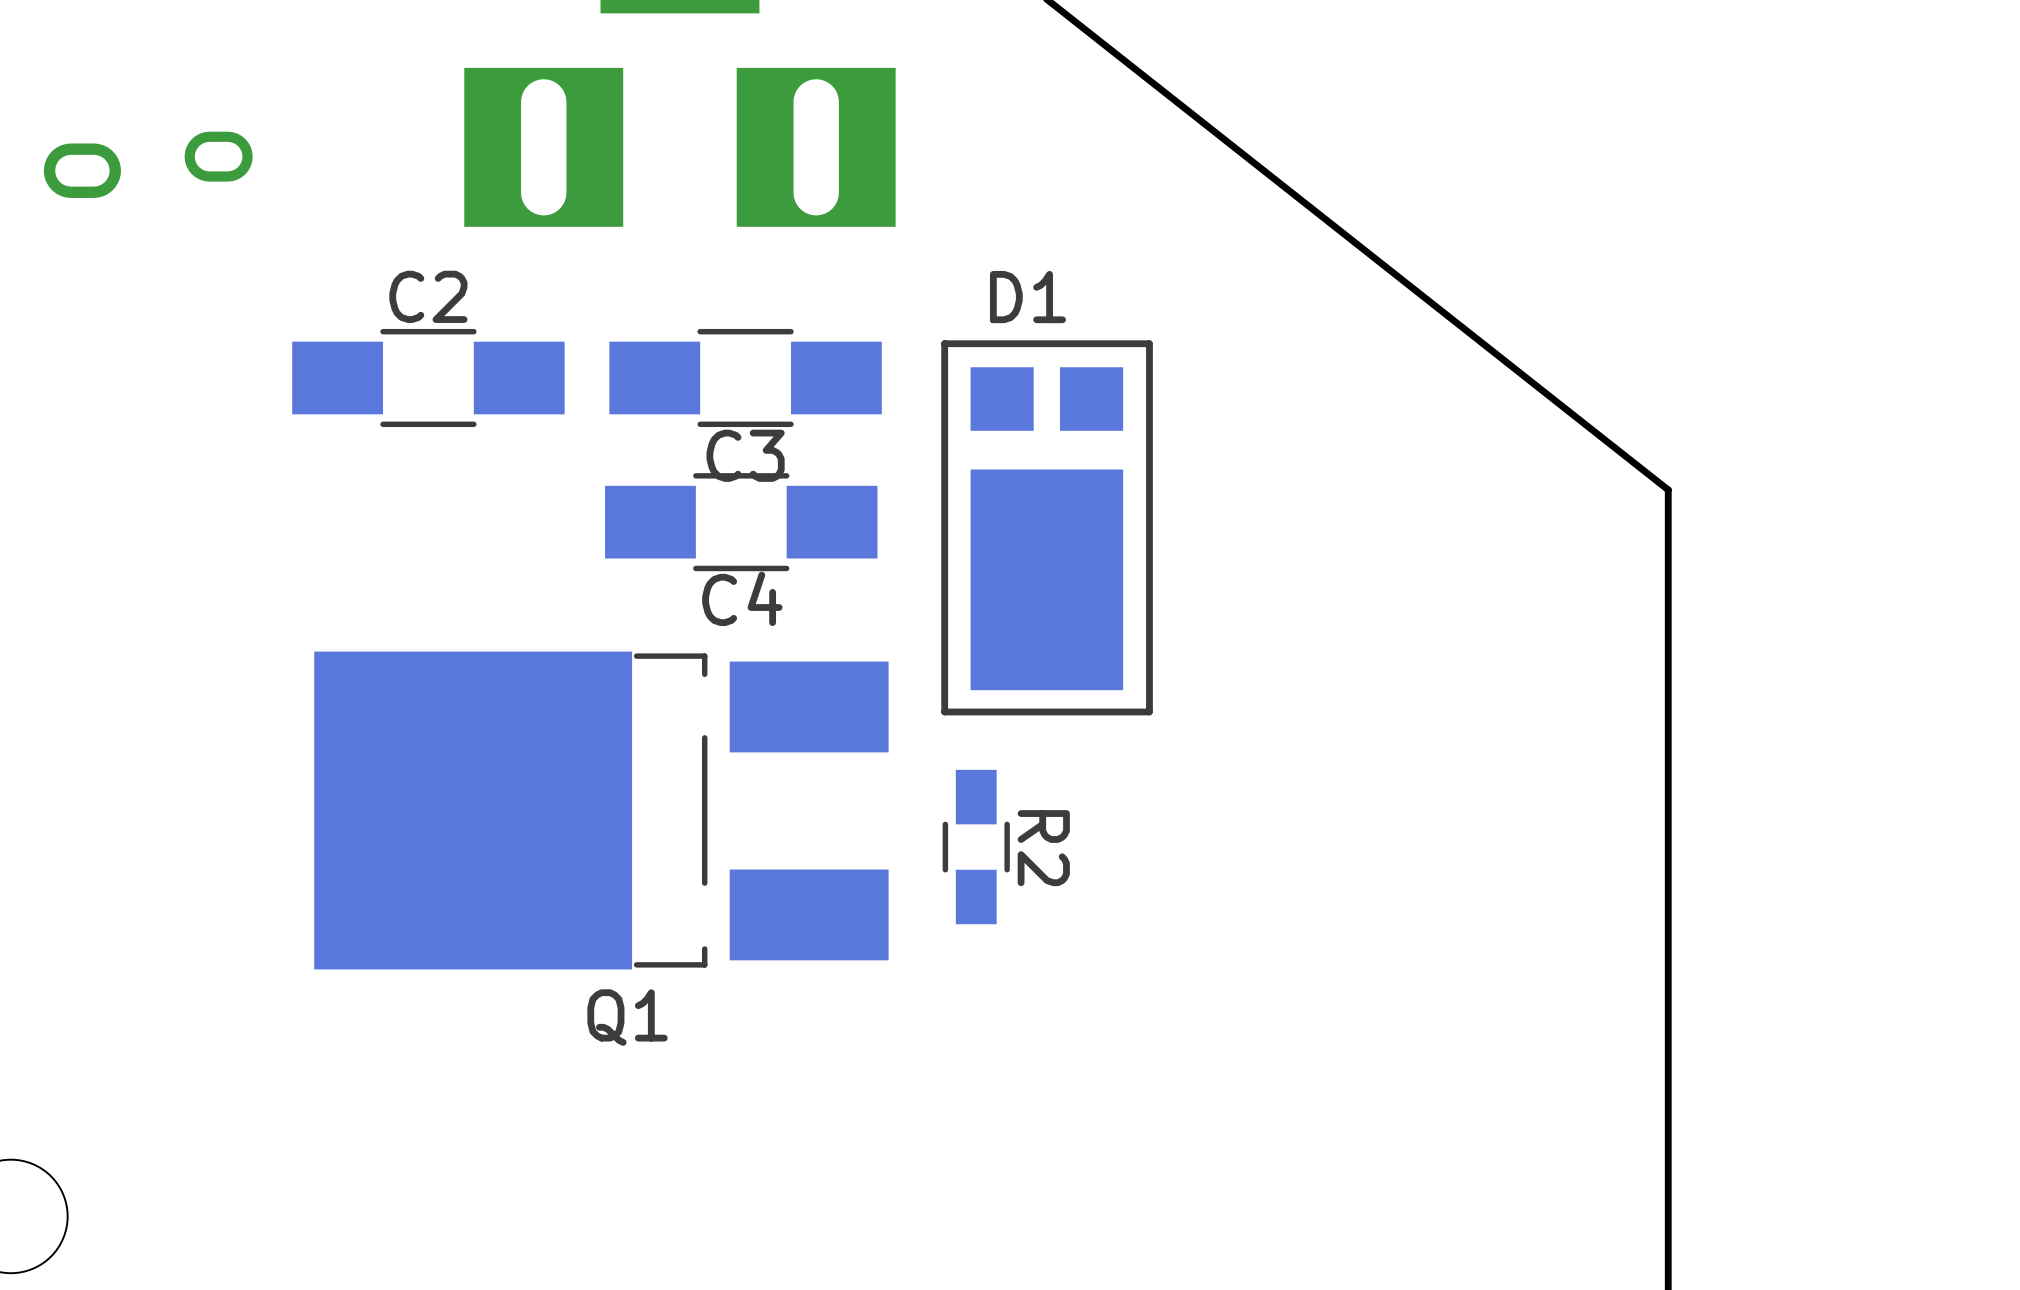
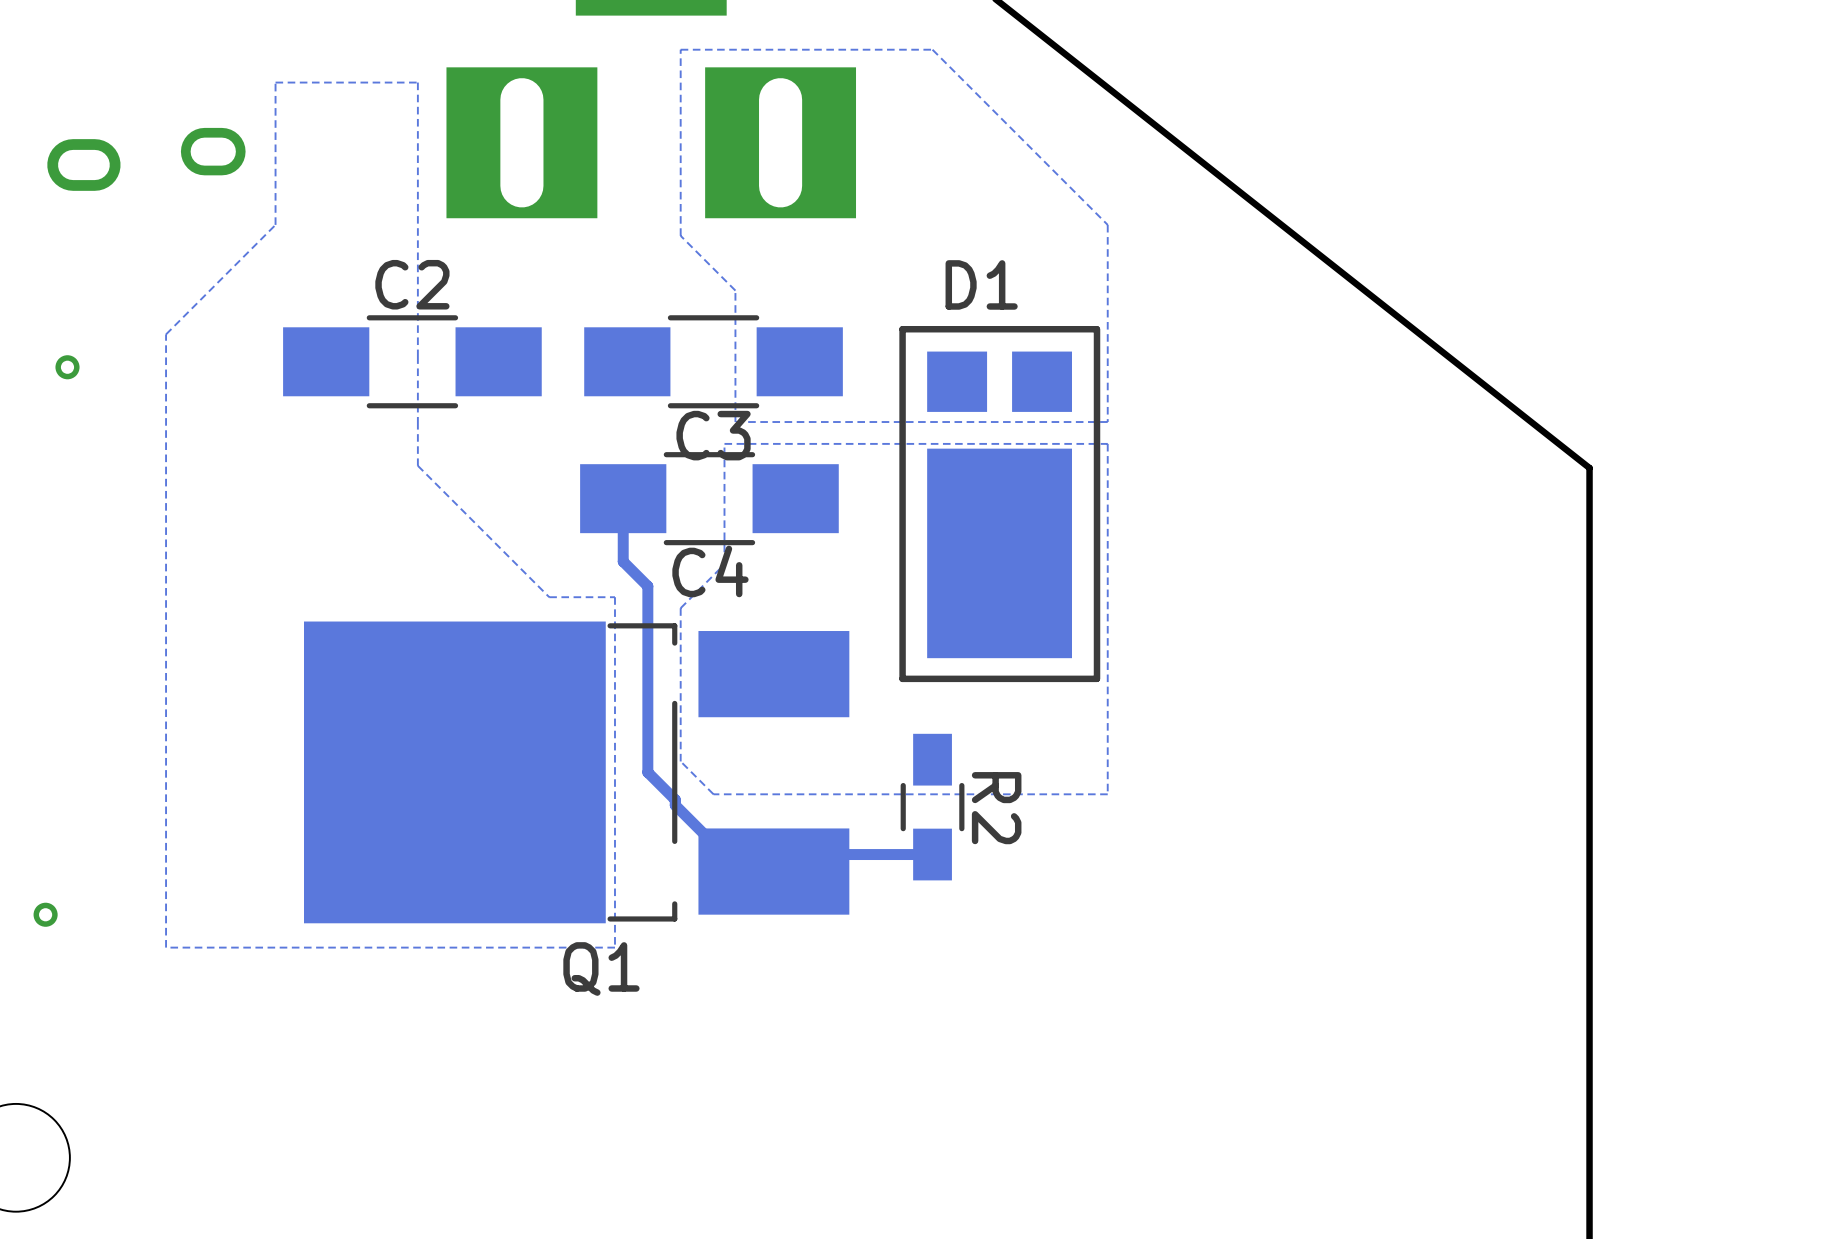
zone outline: none -> (932, 49) (680, 49) (680, 235) (735, 290) (735, 422) (1107, 422) (1107, 224) (932, 49)
zone outline: none -> (417, 82) (417, 465) (549, 597) (614, 597) (614, 947) (166, 947) (166, 334) (275, 224) (275, 82) (417, 82)
via: none -> (67, 367)
zone outline: none -> (1107, 443) (1107, 794) (713, 794) (680, 761) (680, 608) (724, 564) (724, 443) (1107, 443)
track: none -> (623, 498) (623, 561) (647, 586) (647, 772) (675, 799) (675, 805) (741, 871) (773, 871) (790, 854) (932, 854)
via: none -> (45, 914)

